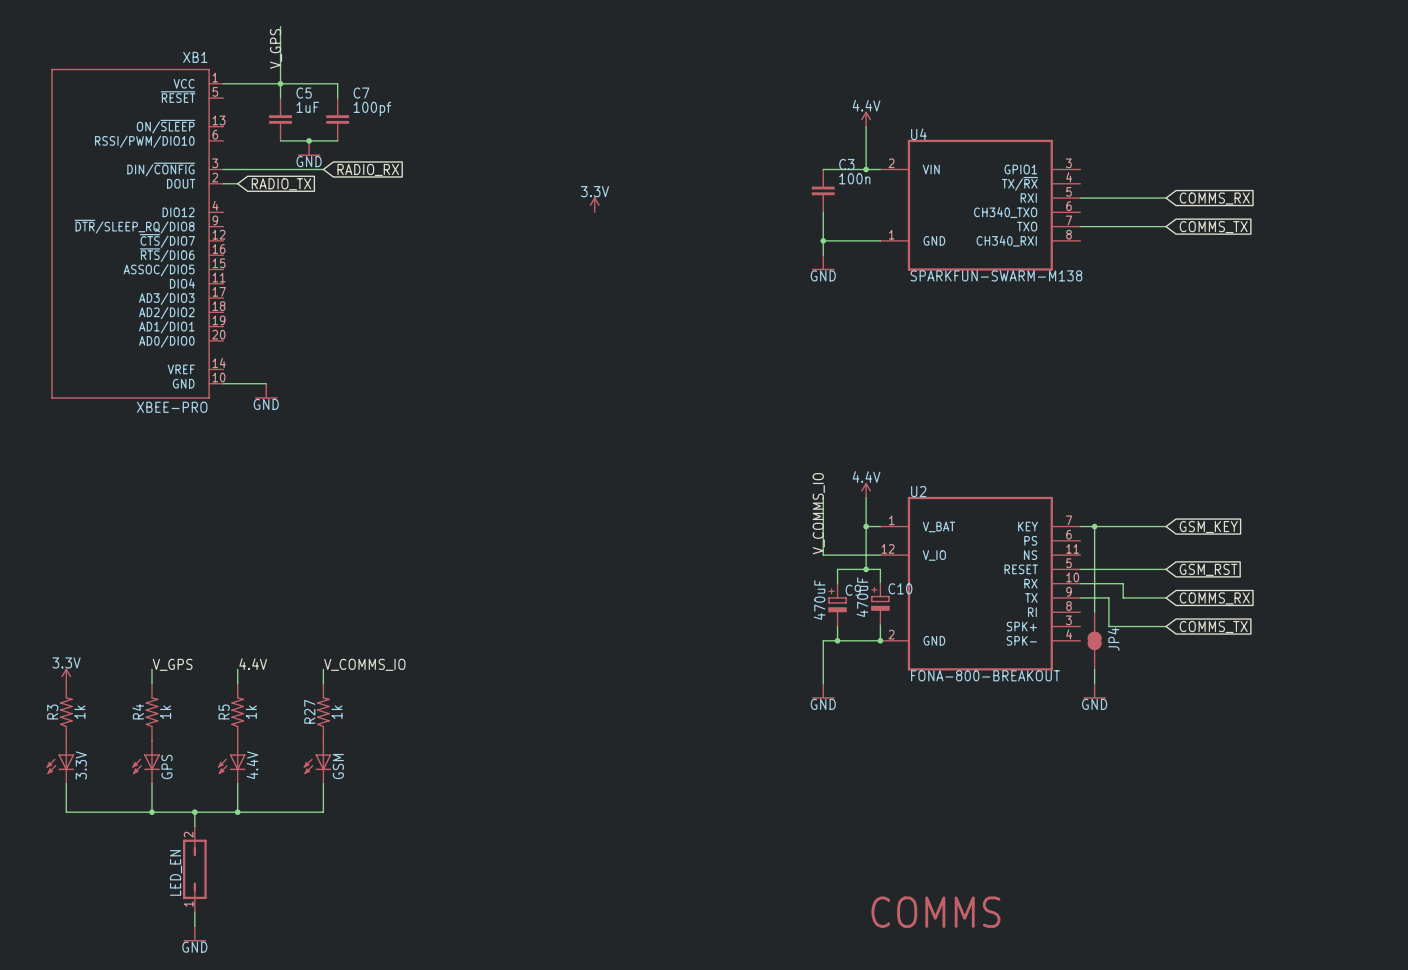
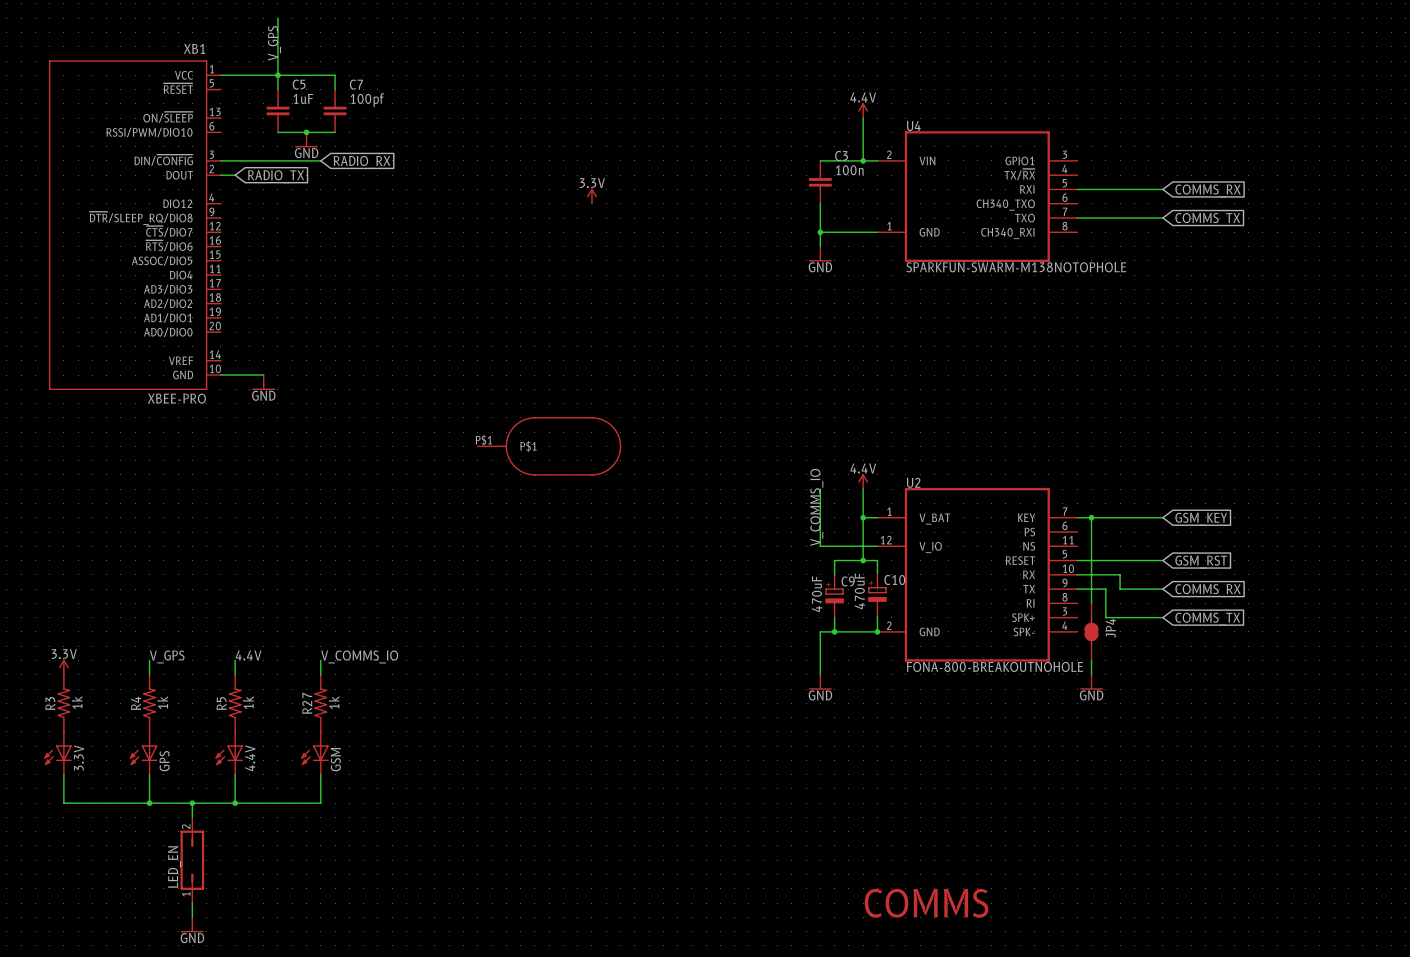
U4 value: SPARKFUN-SWARM-M138 (996, 275) -> SPARKFUN-SWARM-M138NOTOPHOLE (1016, 267)
part: none -> (549, 446)
U2 value: FONA-800-BREAKOUT (985, 675) -> FONA-800-BREAKOUTNOHOLE (995, 666)

